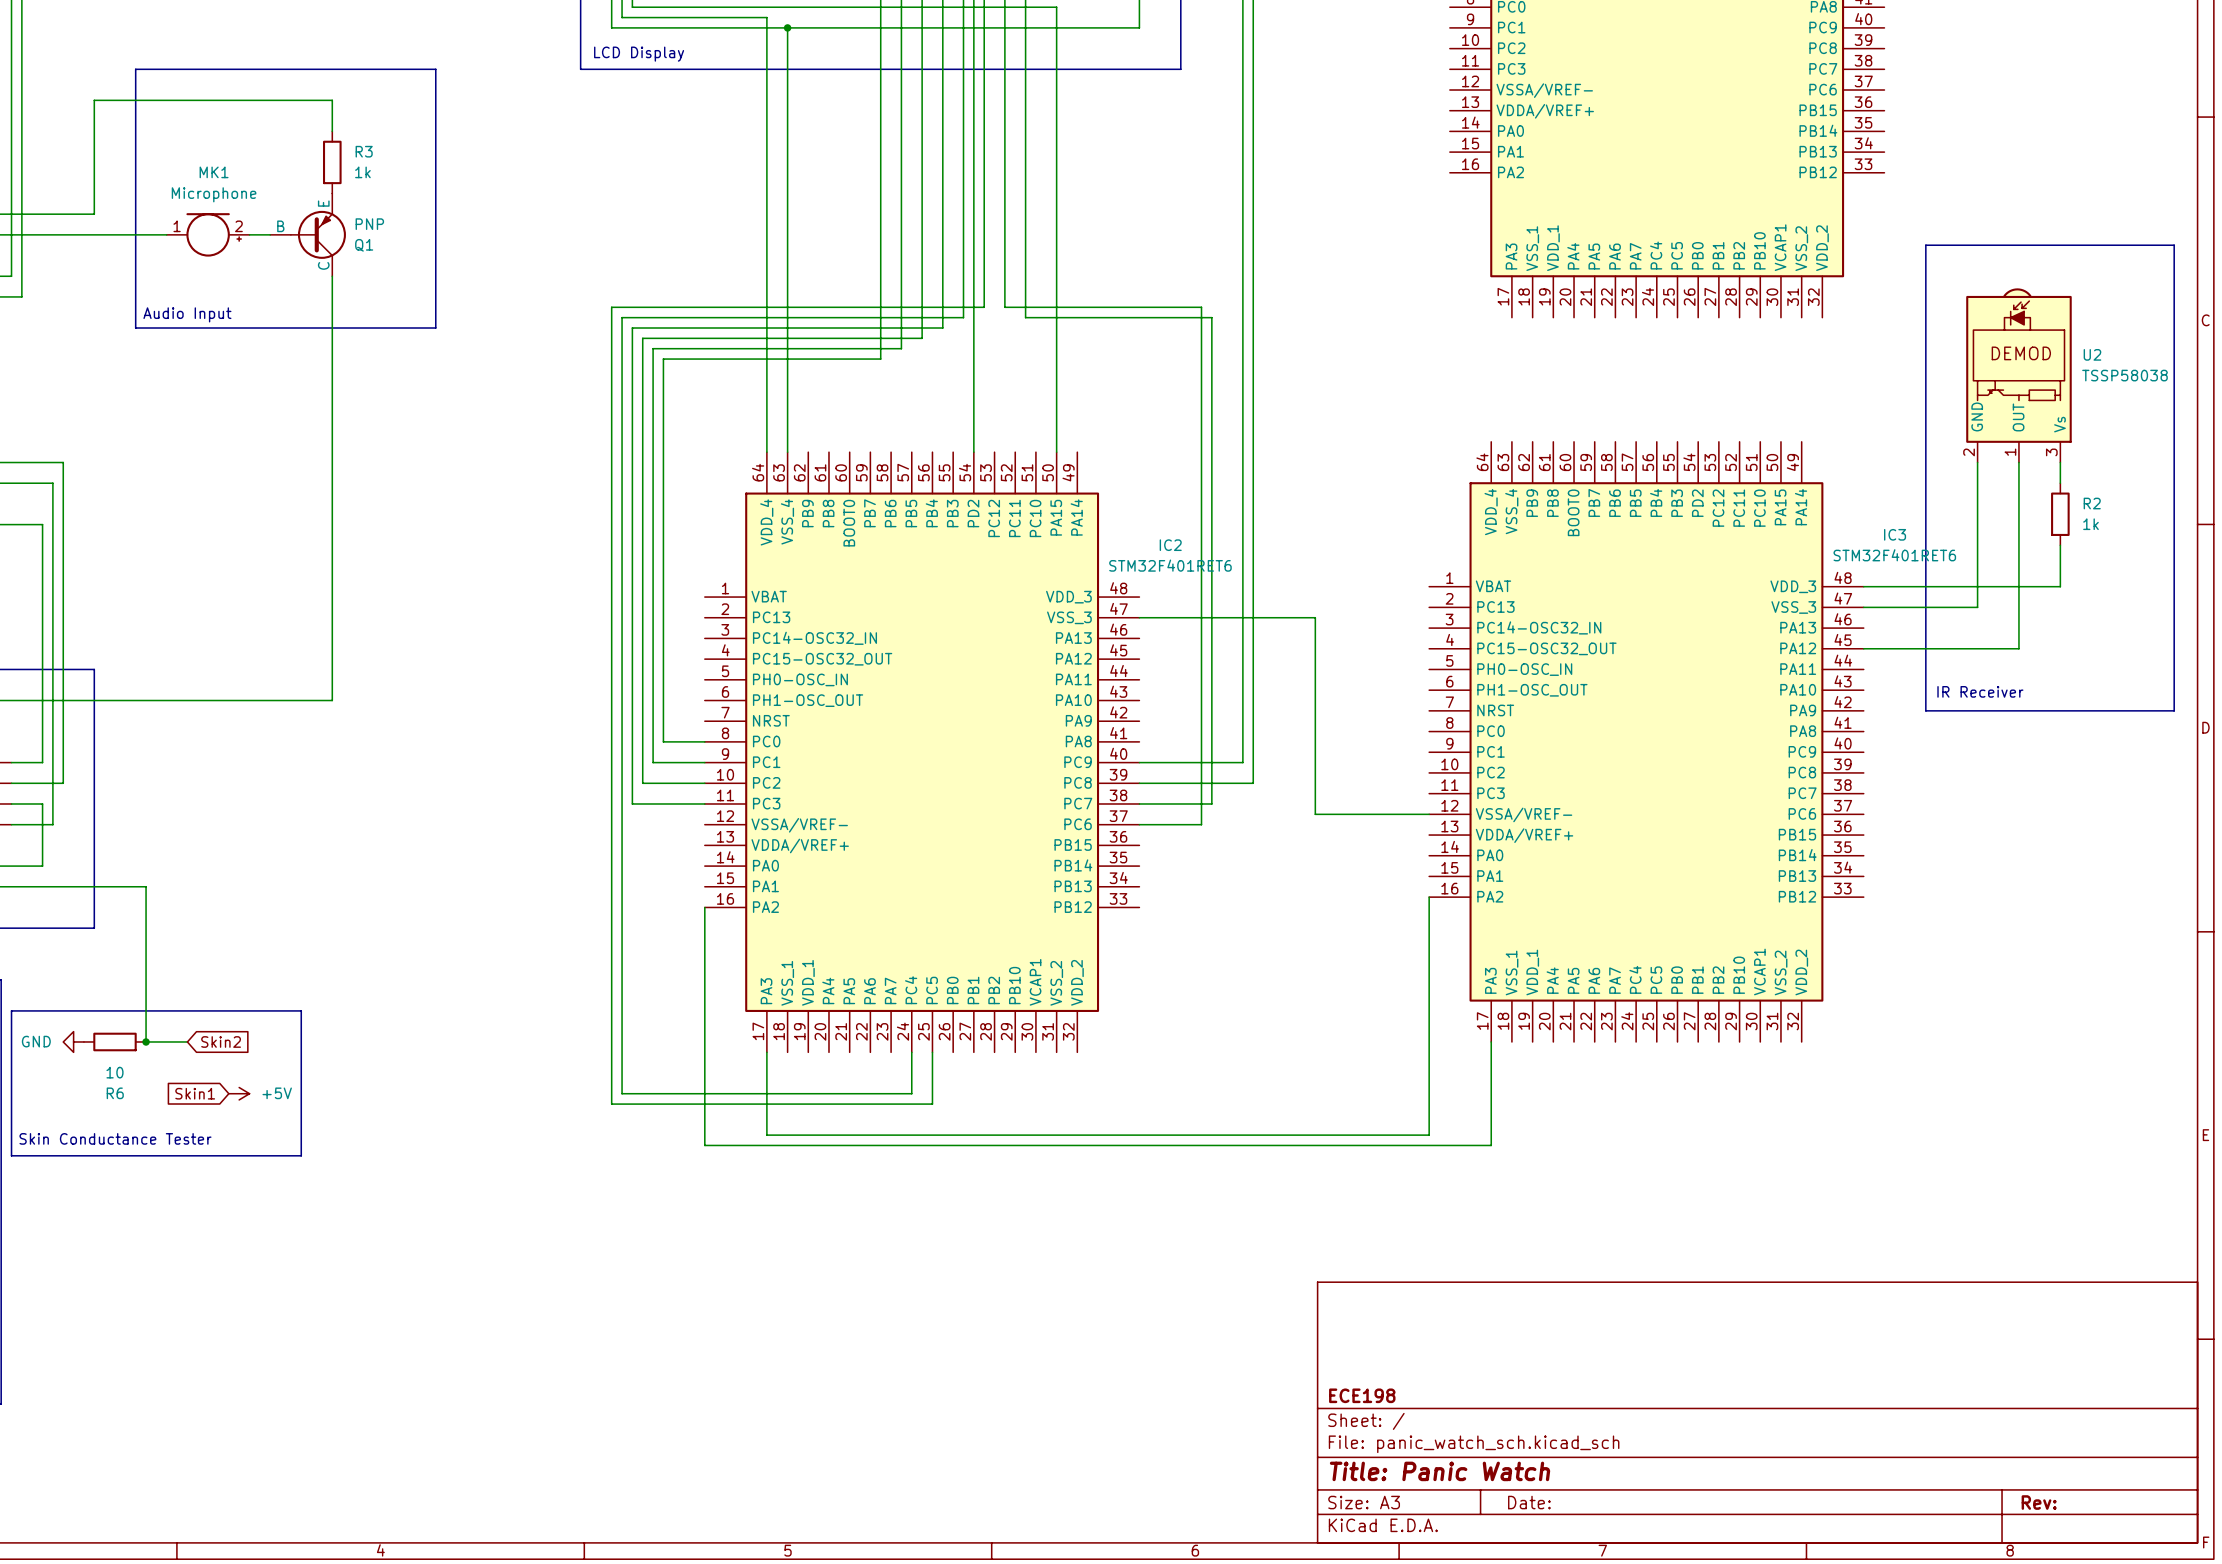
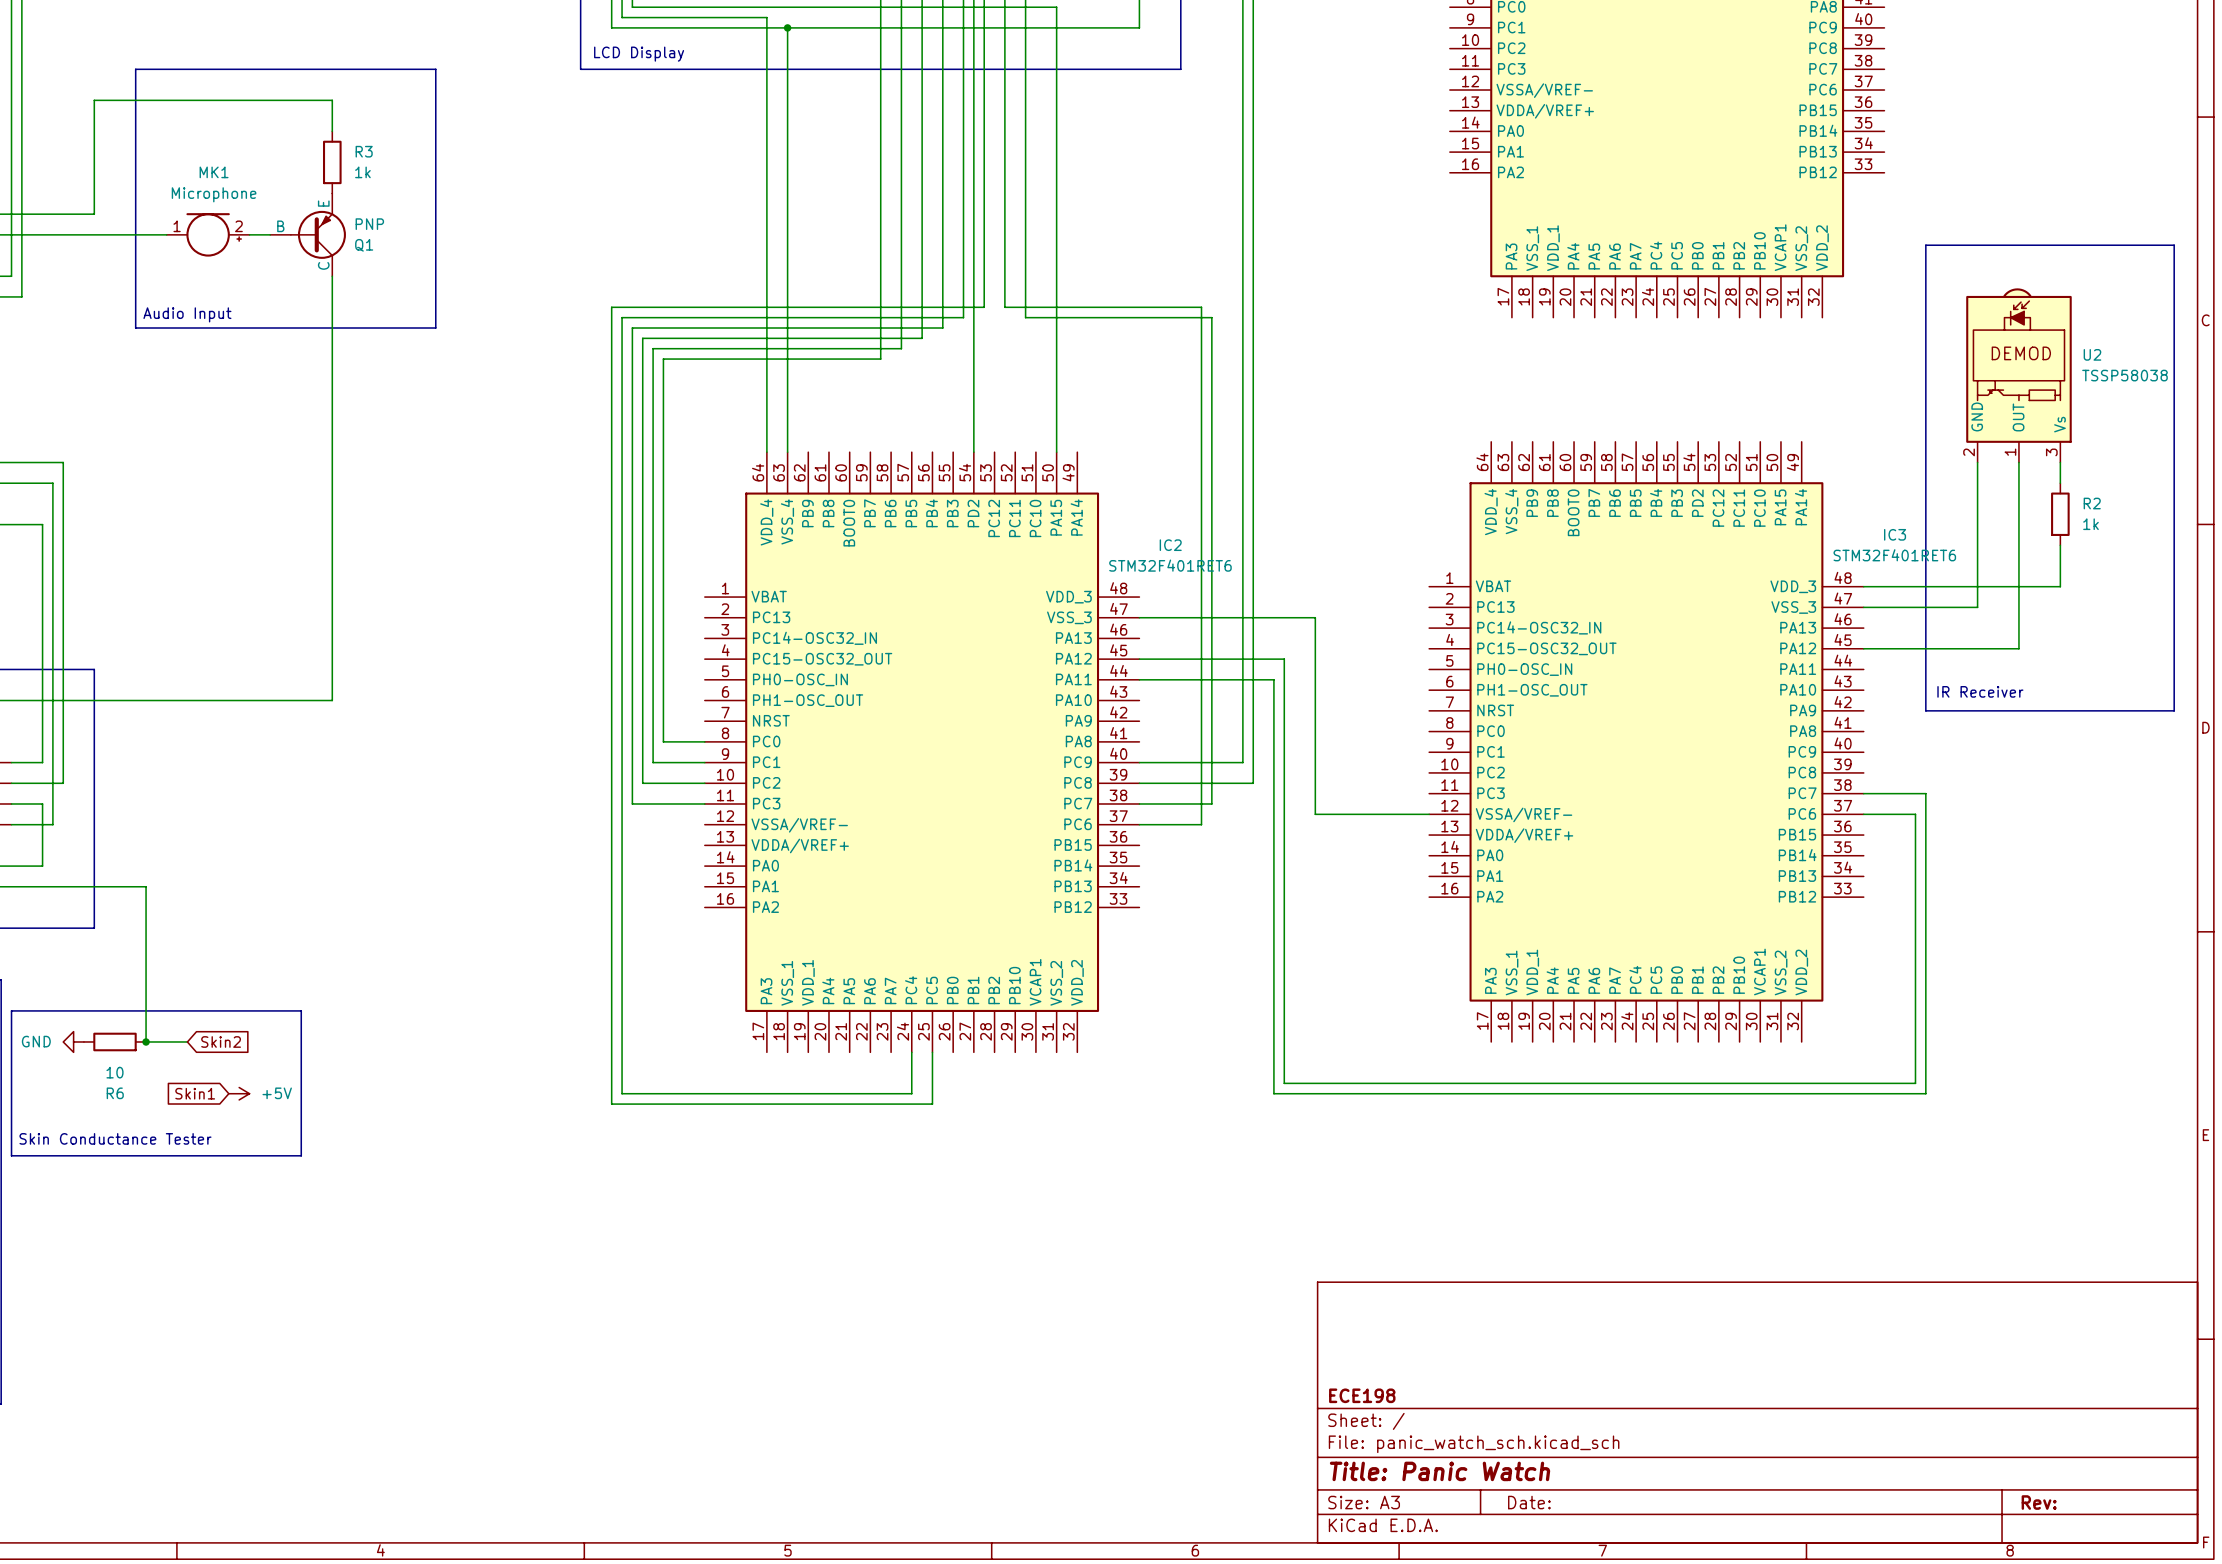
wire: none -> (1139, 659) (1284, 659) (1284, 1083) (1915, 1083) (1915, 814) (1863, 814)
wire: none -> (1139, 679) (1273, 679) (1273, 1093) (1925, 1093) (1925, 793) (1863, 793)
wire: (1429, 897) (1429, 1135) (766, 1135) (766, 1052) -> none
wire: (704, 907) (704, 1145) (1491, 1145) (1491, 1041) -> none

